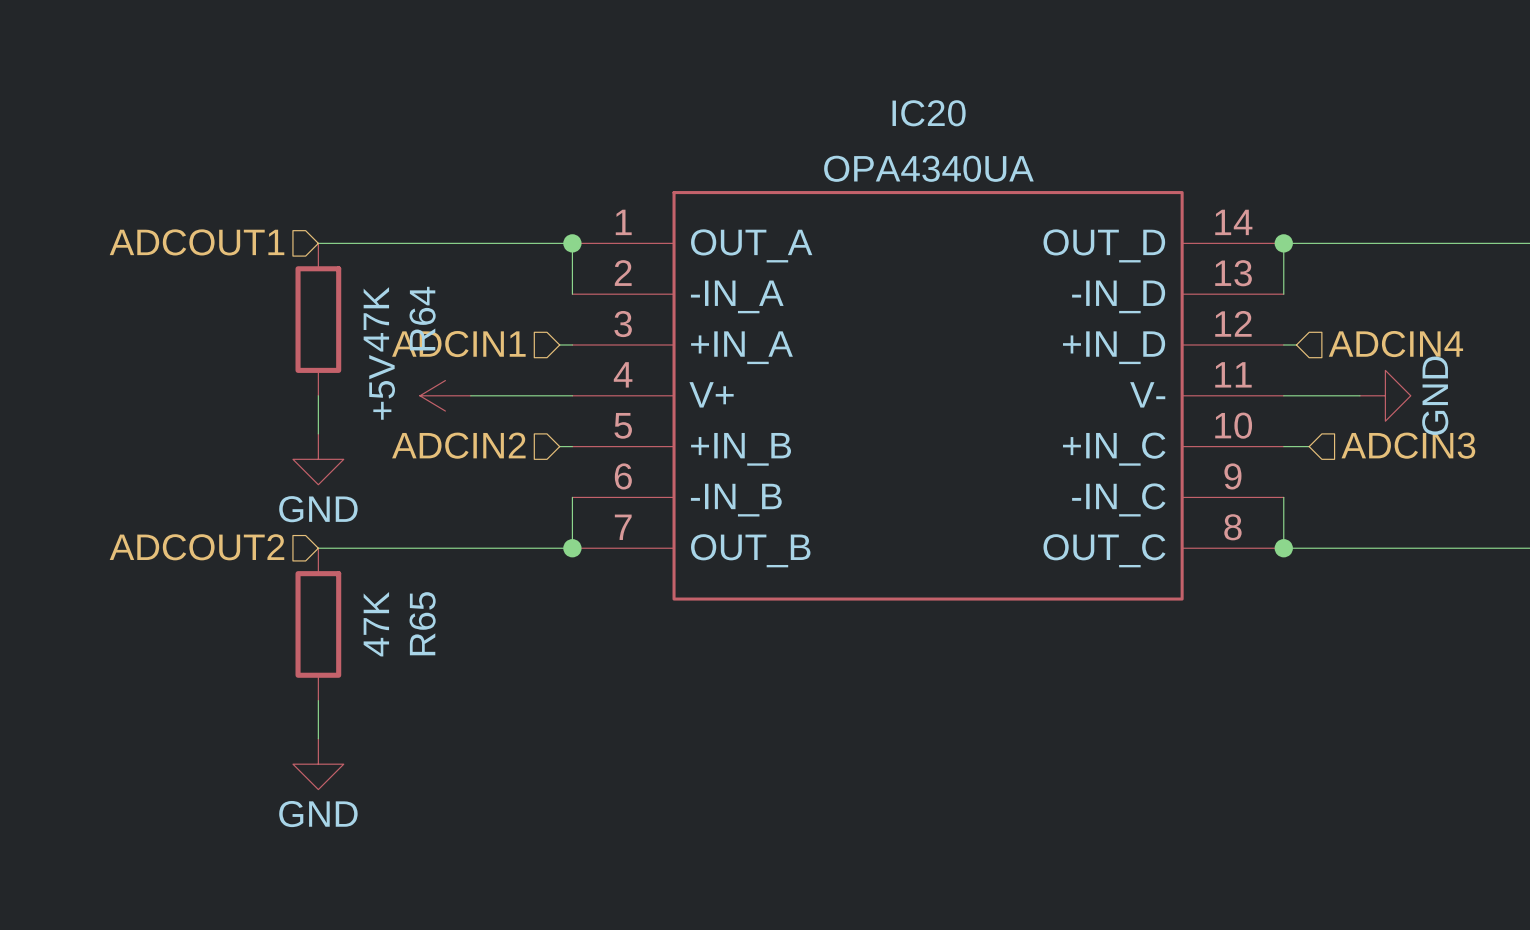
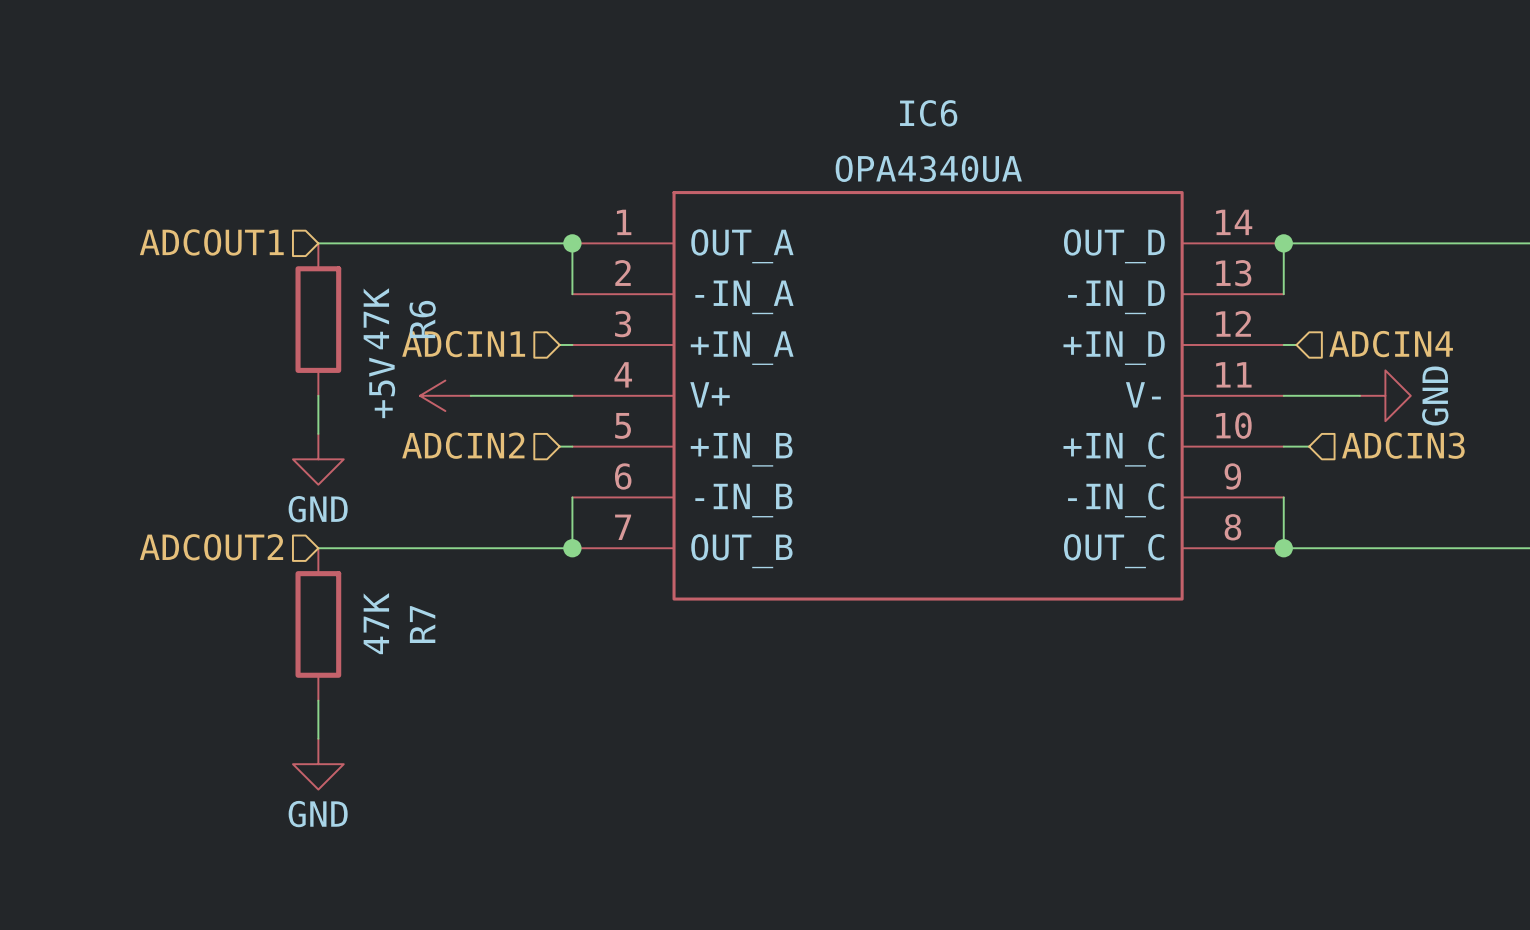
IC20 name: IC20 (929, 113) -> IC6 (928, 113)
R64 name: R64 (422, 318) -> R6 (422, 319)
R65 name: R65 (422, 623) -> R7 (422, 624)

